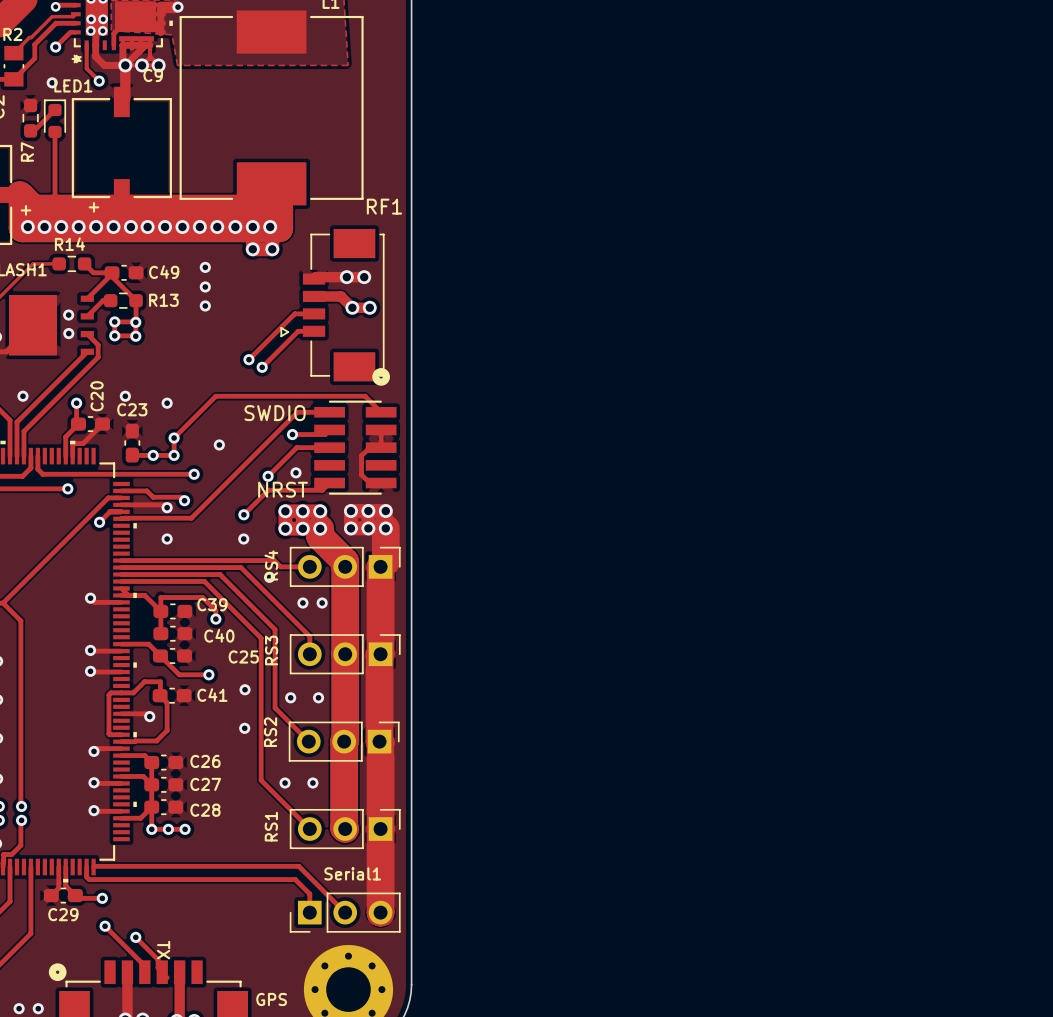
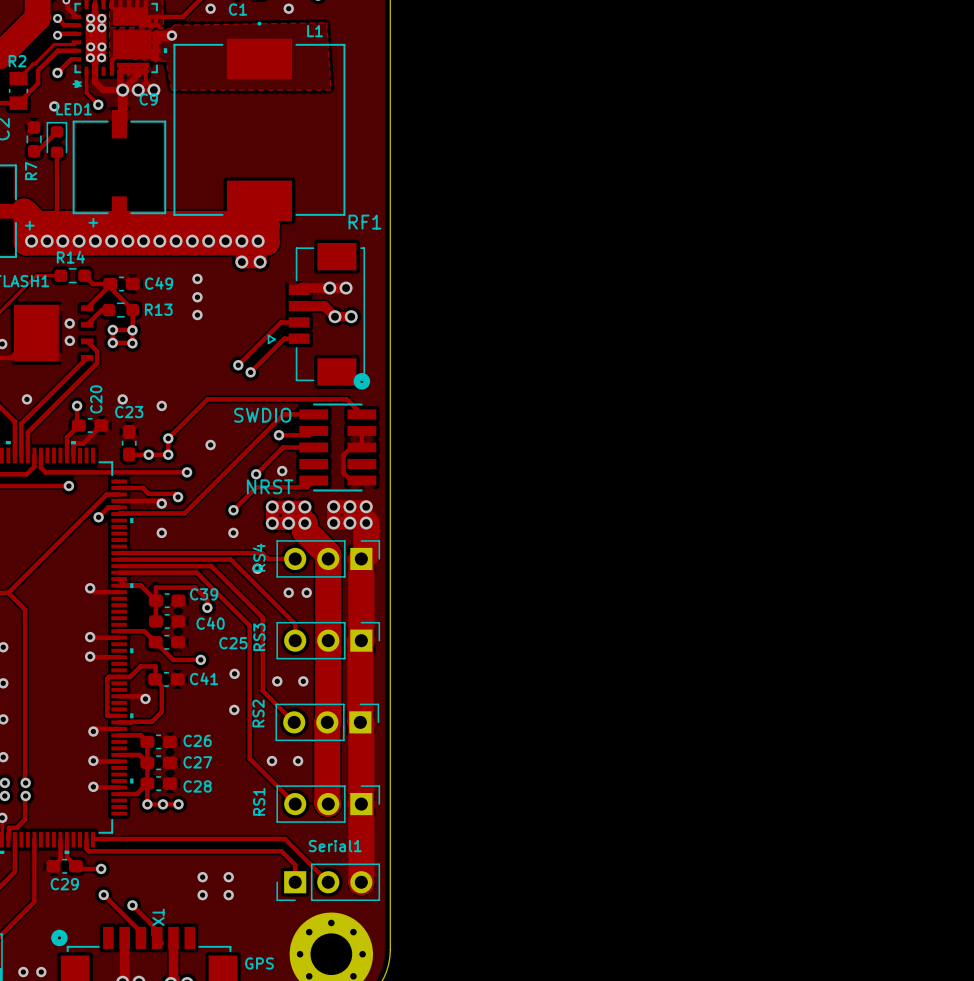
via: none -> (202, 877)
via: none -> (228, 877)
via: none -> (202, 895)
via: none -> (228, 895)

